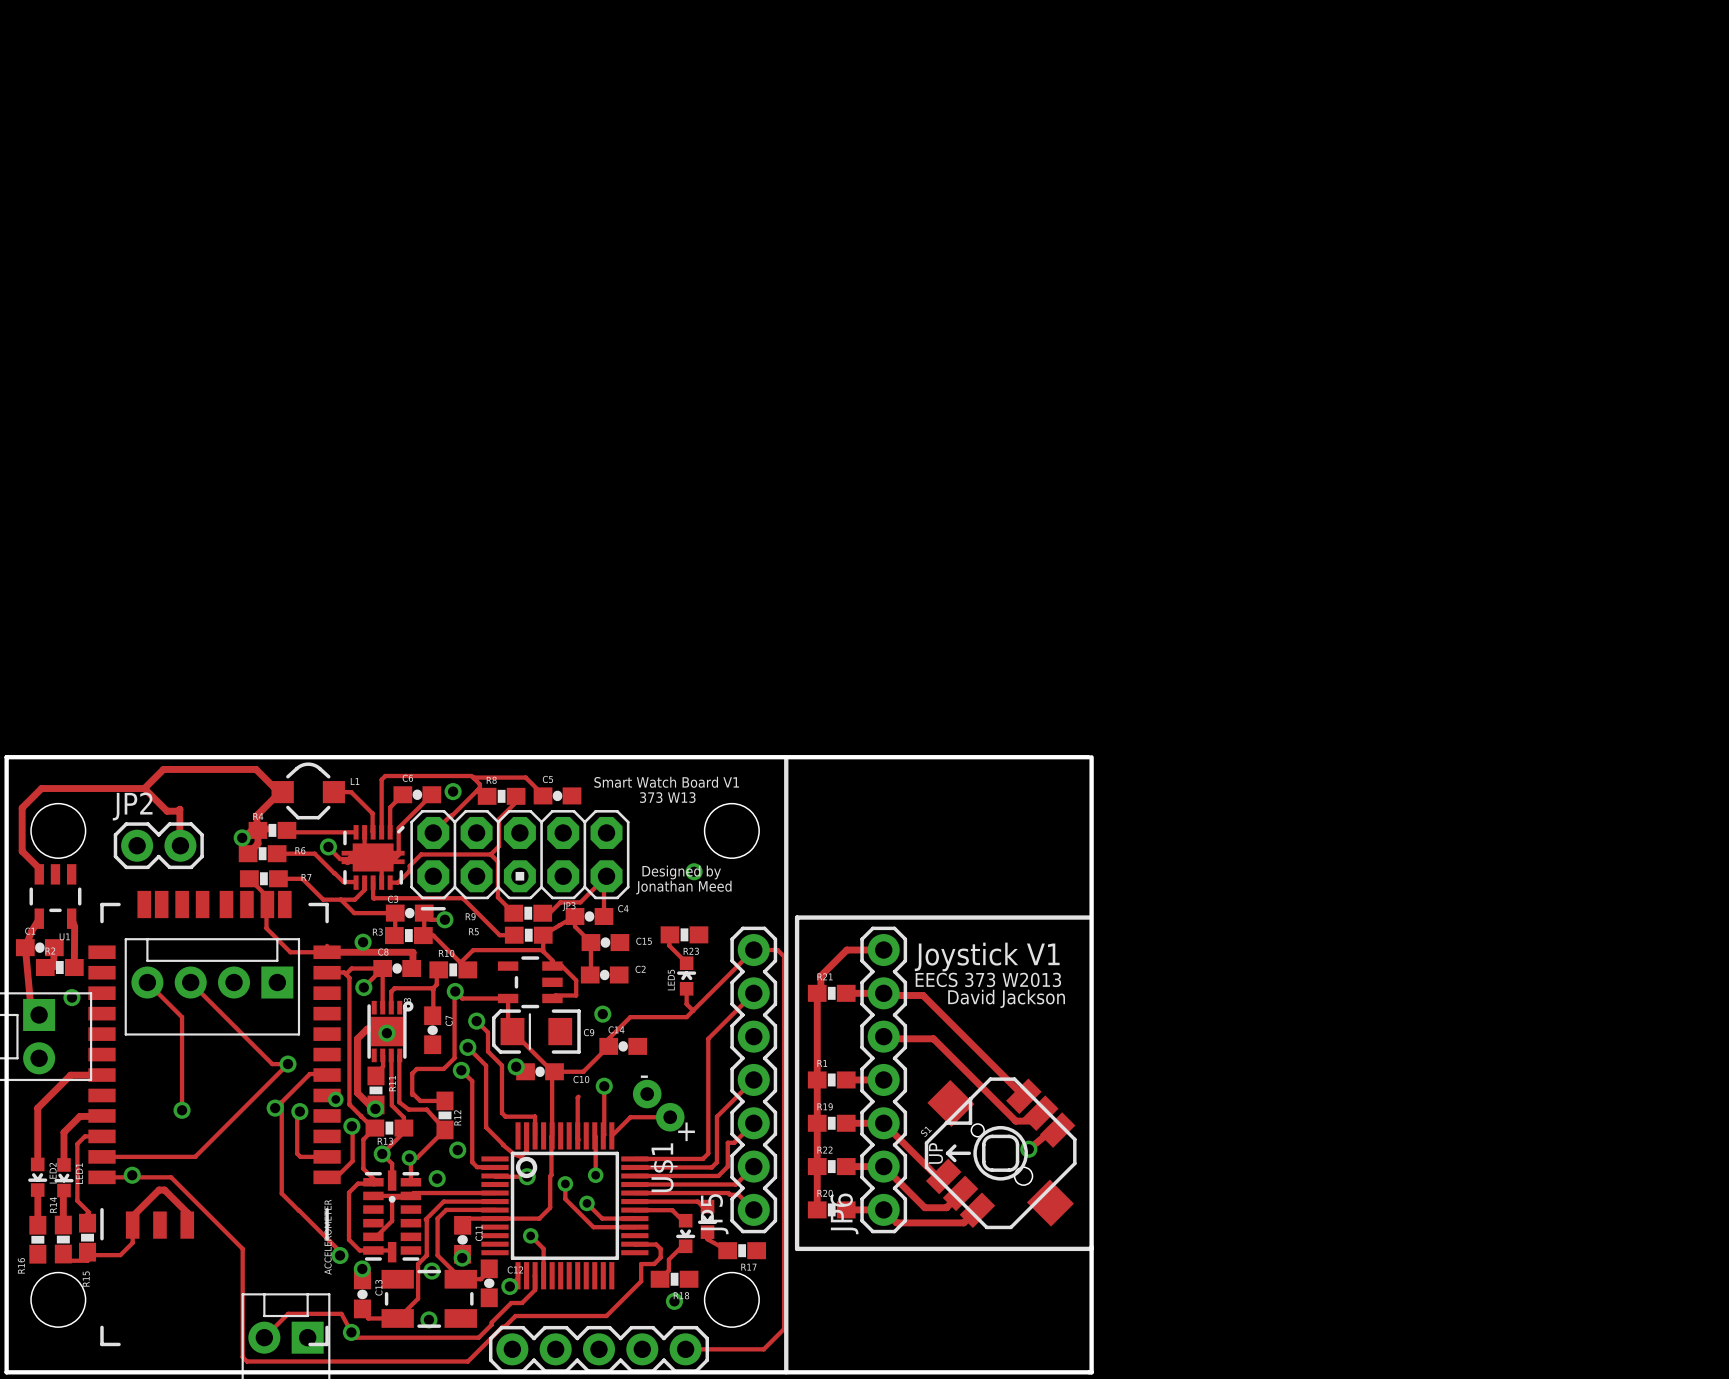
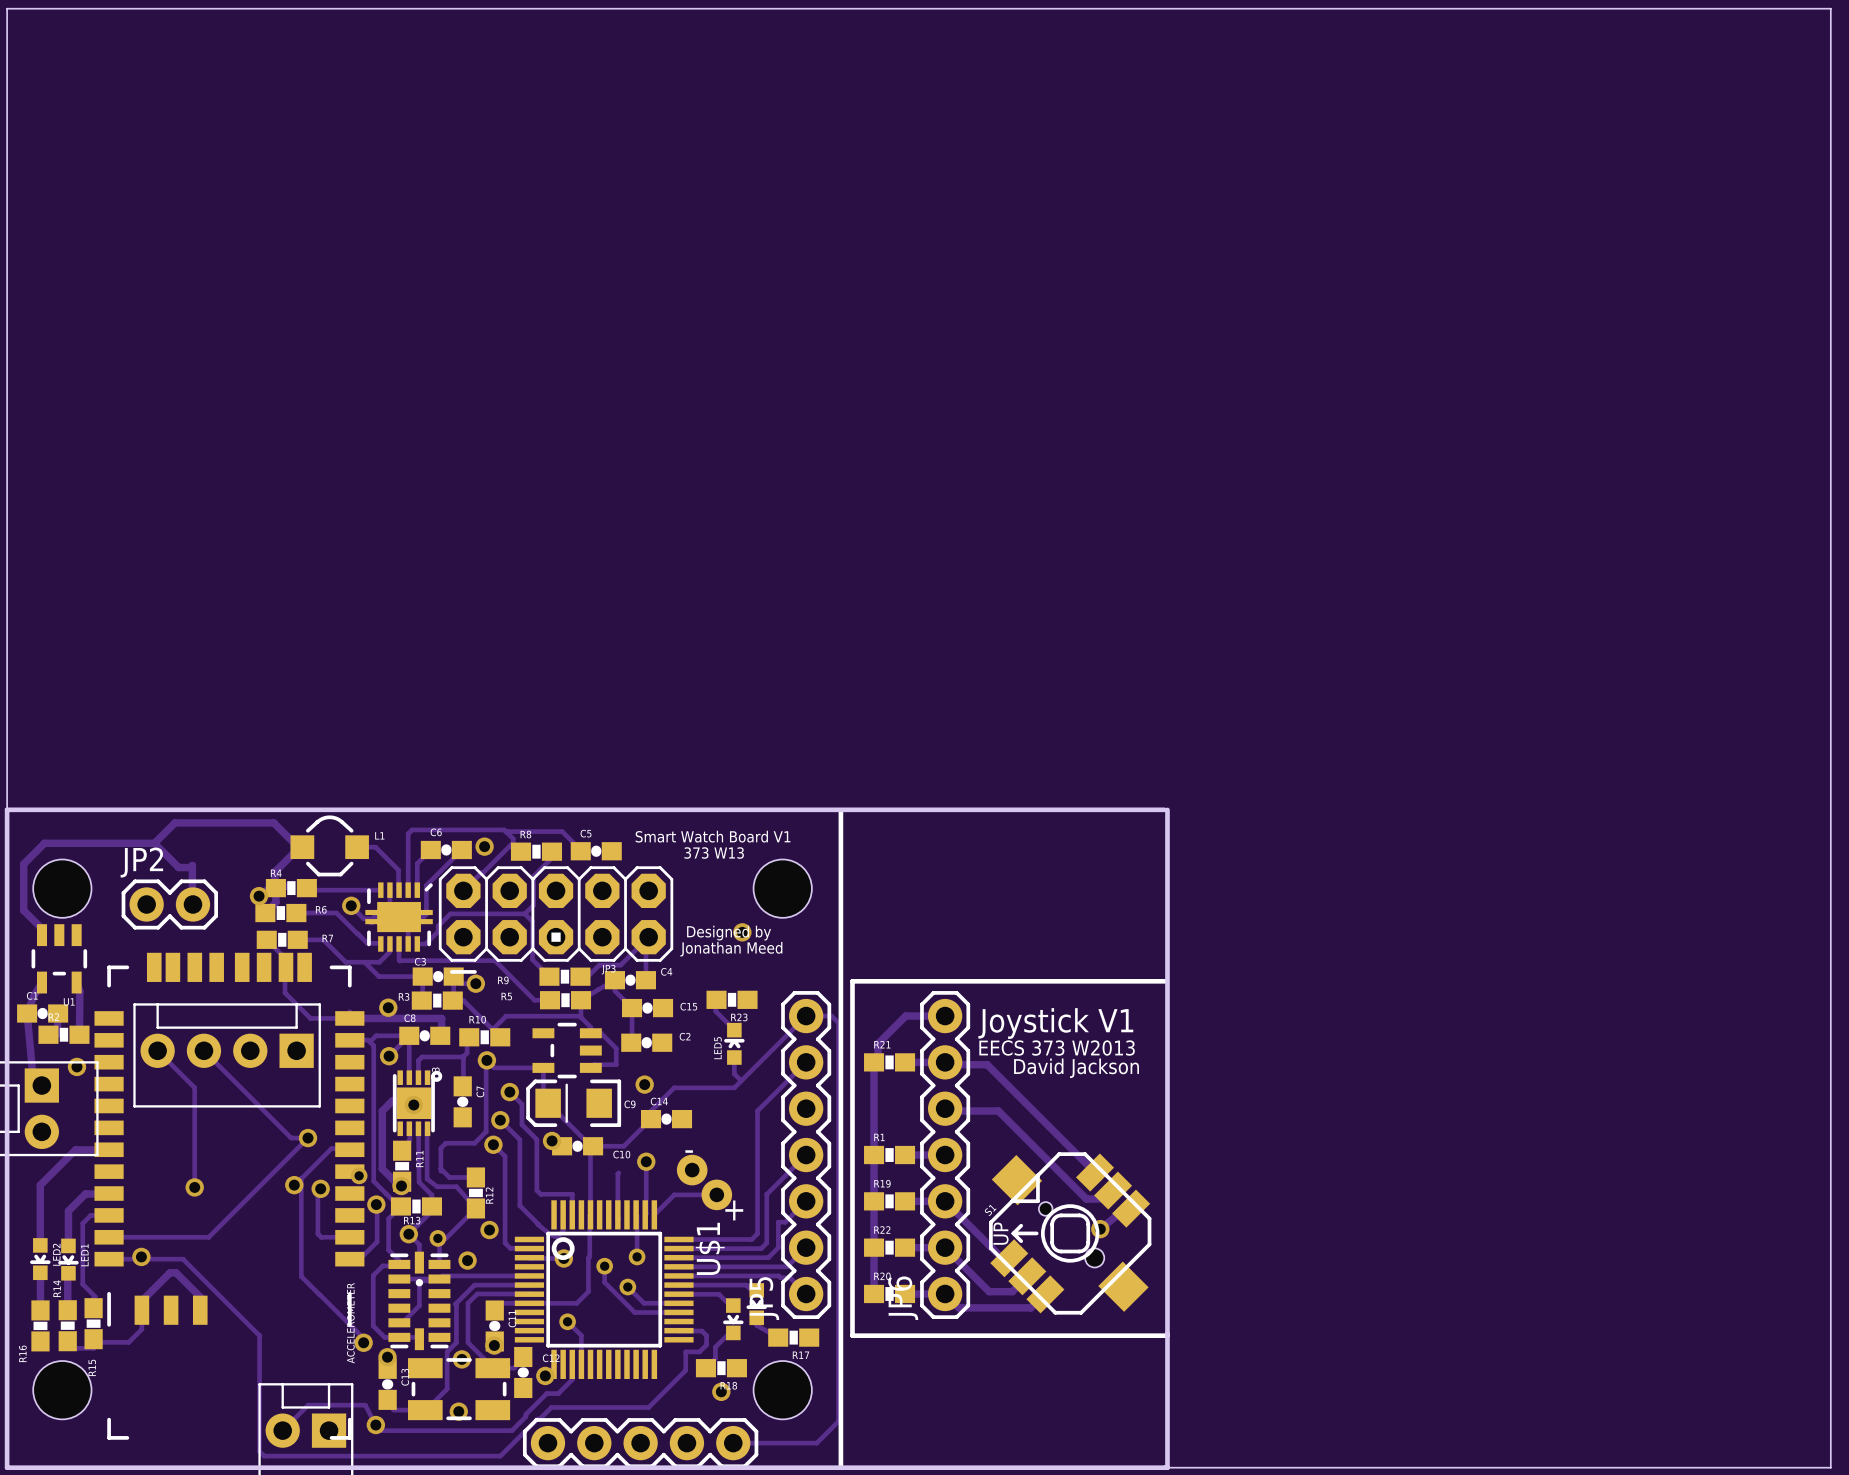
board edge: none -> (7, 809) (7, 8) (1830, 8) (1830, 1467) (1165, 1467)

